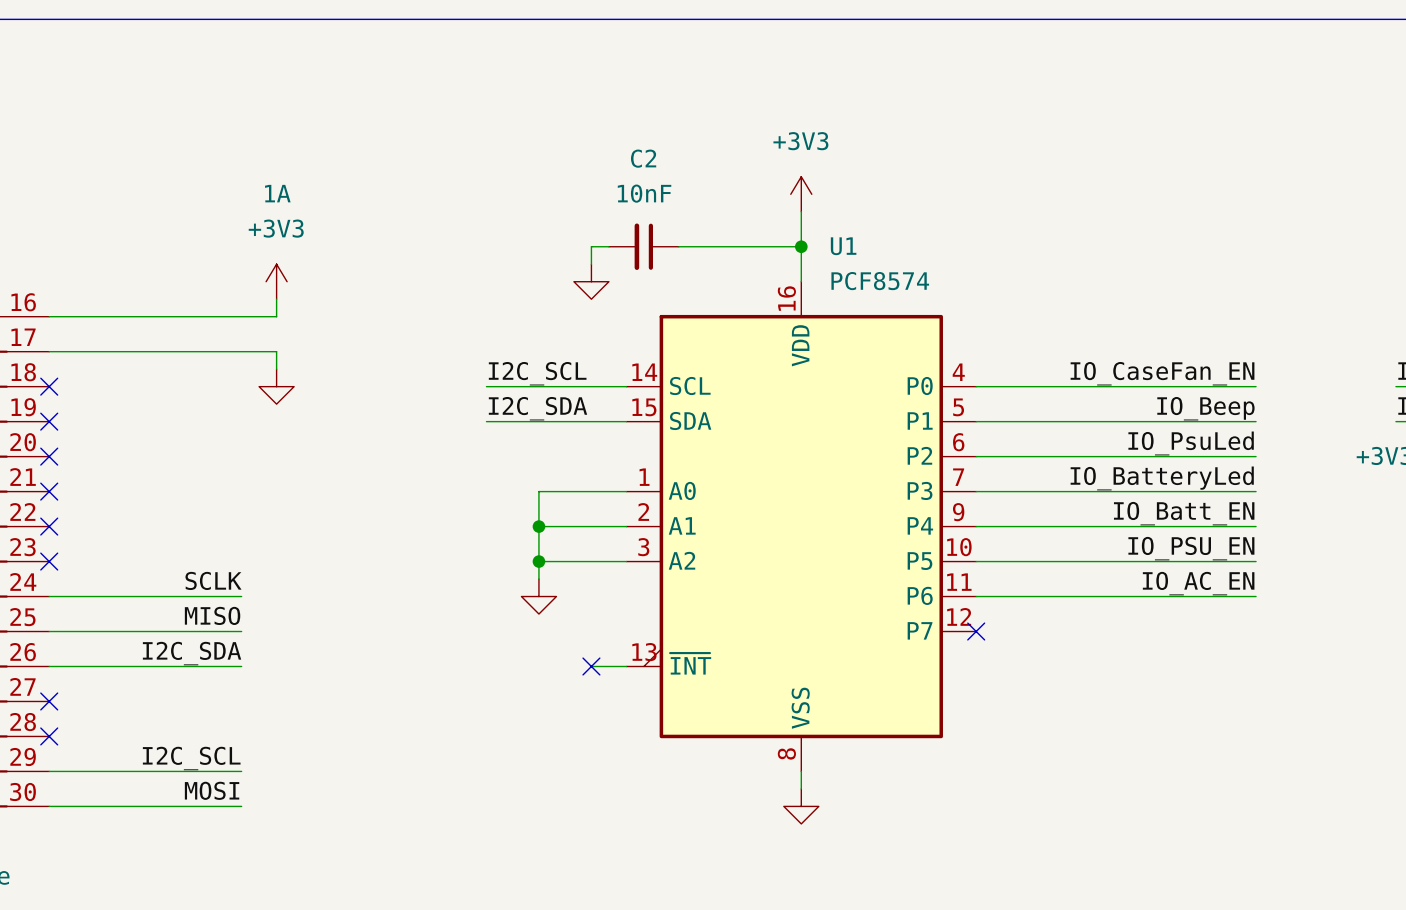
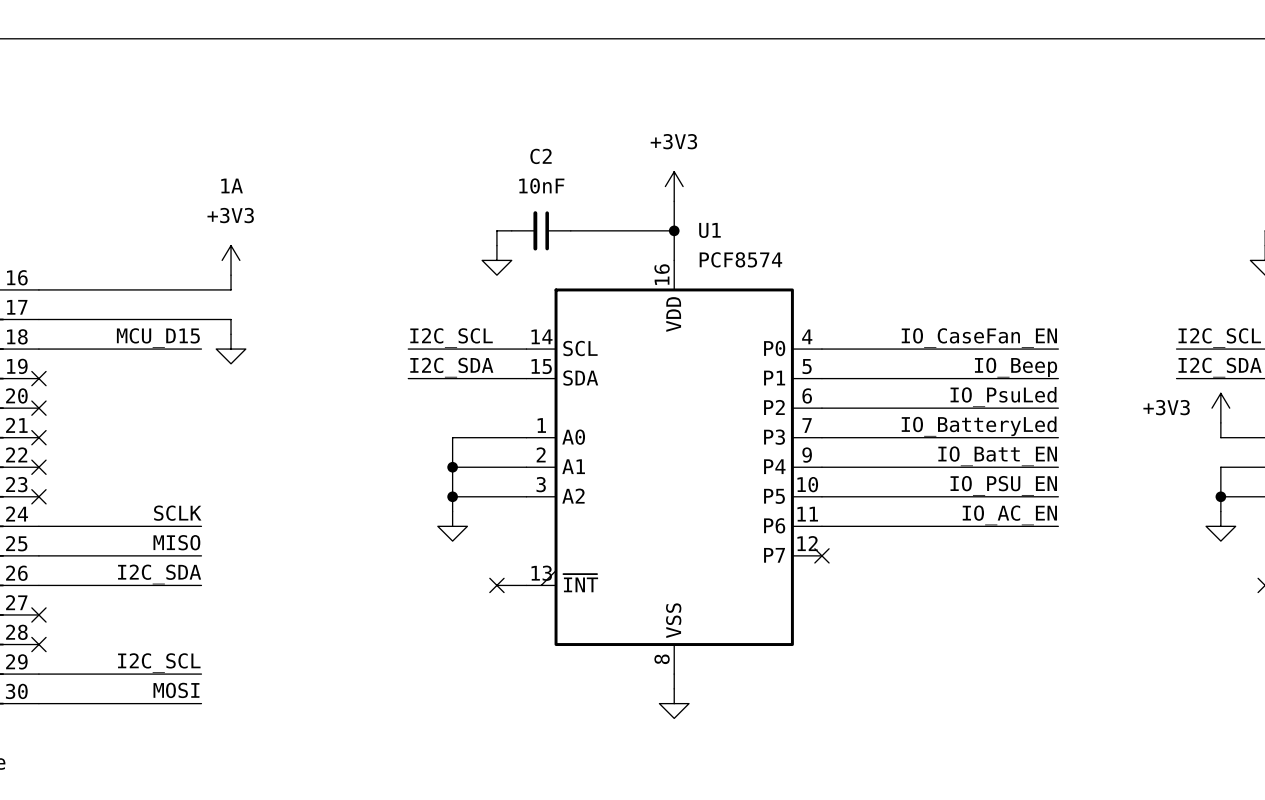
label: none -> MCU_D15 (158, 338)
wire: none -> (38, 349) (201, 349)
no-connect mark: (49, 386) -> none

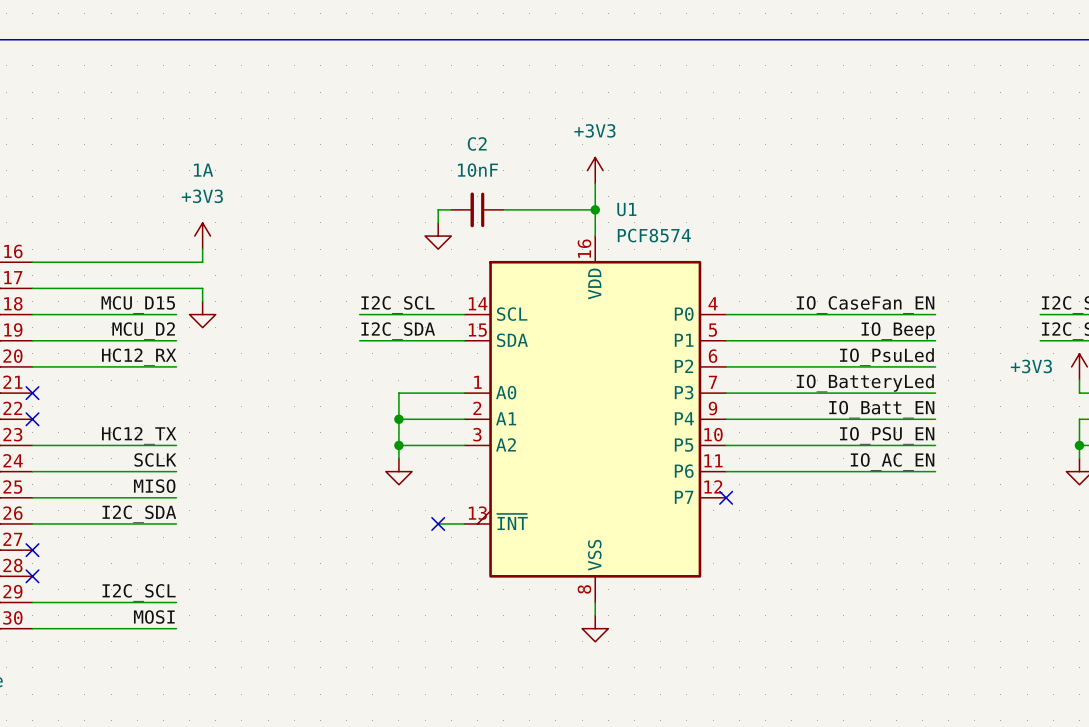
label: none -> MCU_D2 (143, 331)
wire: none -> (32, 340) (176, 340)
no-connect mark: (38, 378) -> none
label: none -> HC12_RX (139, 357)
wire: none -> (32, 366) (176, 366)
no-connect mark: (38, 408) -> none
label: none -> HC12_TX (139, 435)
wire: none -> (32, 445) (176, 445)
no-connect mark: (38, 496) -> none

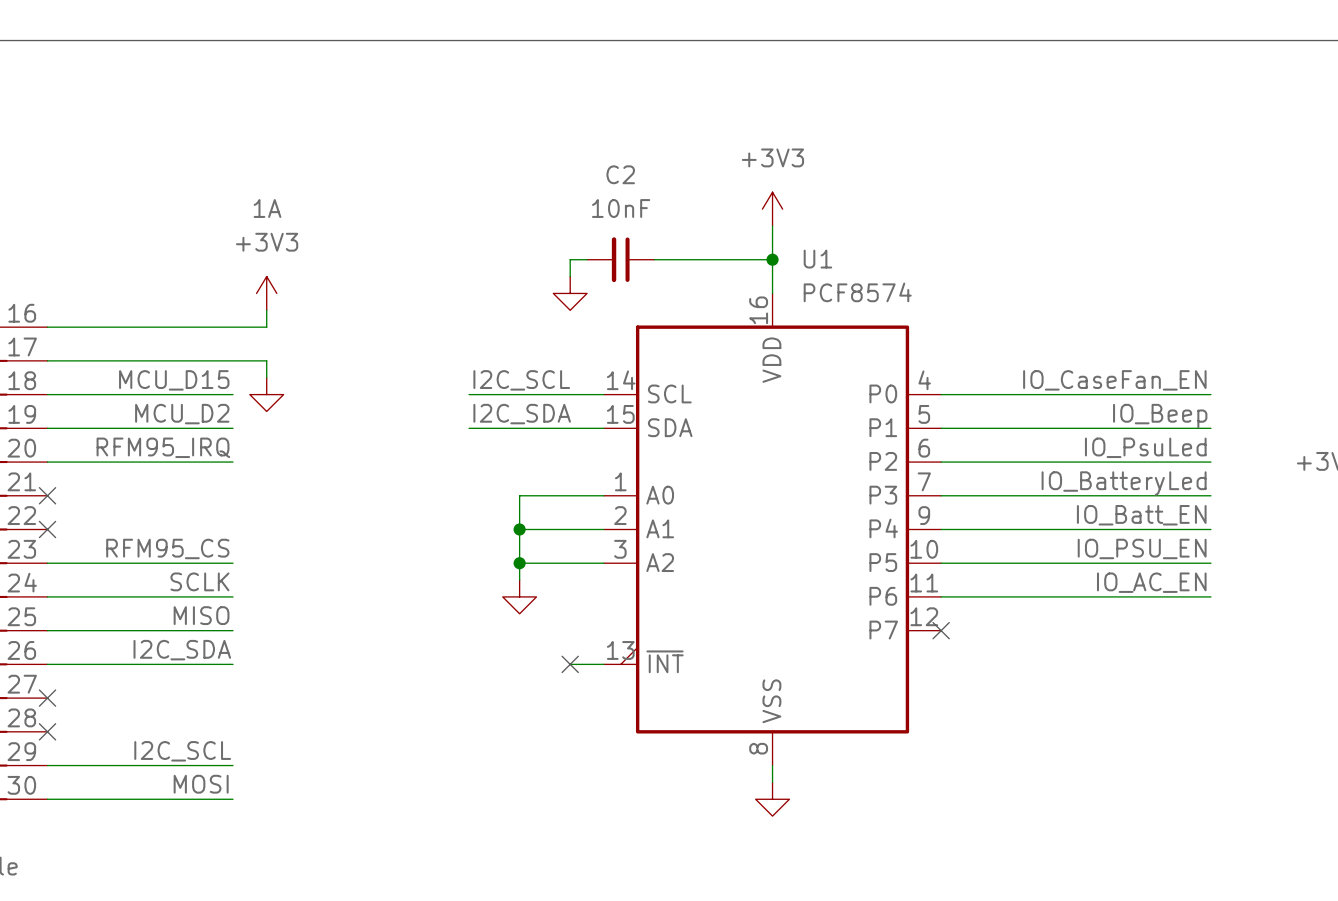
label: HC12_RX (139, 357) -> RFM95_IRQ (163, 447)
label: HC12_TX (139, 435) -> RFM95_CS (167, 548)

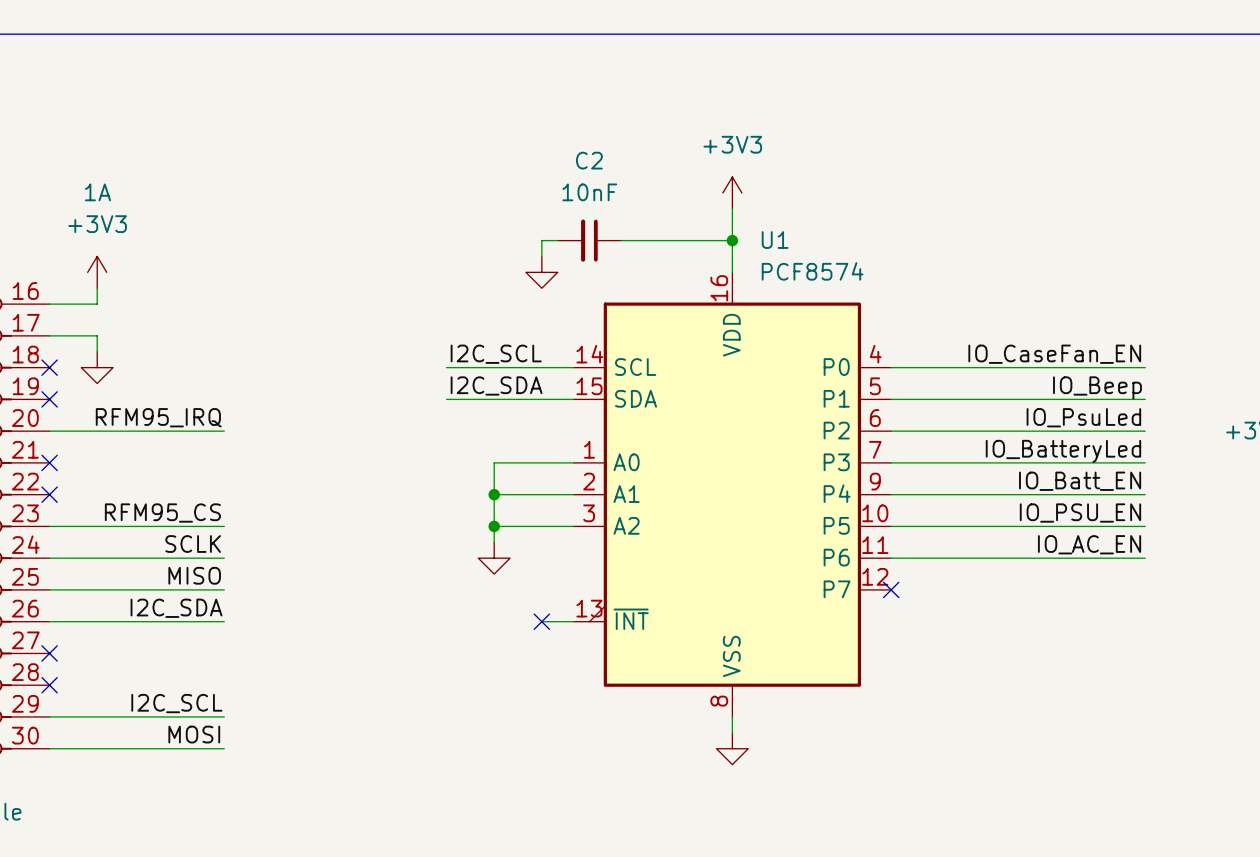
power symbol position: +3V3 (266, 293) -> +3V3 (97, 272)
wire: (266, 310) (266, 327) (98, 327) -> (97, 288) (97, 304)
wire: (98, 360) (266, 360) (266, 377) -> (97, 335) (97, 351)
label: MCU_D15 (174, 380) -> none
wire: (47, 394) (232, 394) -> none
no-connect mark: none -> (49, 367)
power symbol position: (266, 394) -> (97, 367)
label: MCU_D2 (182, 414) -> none
wire: (47, 428) (232, 428) -> none
no-connect mark: none -> (49, 399)

